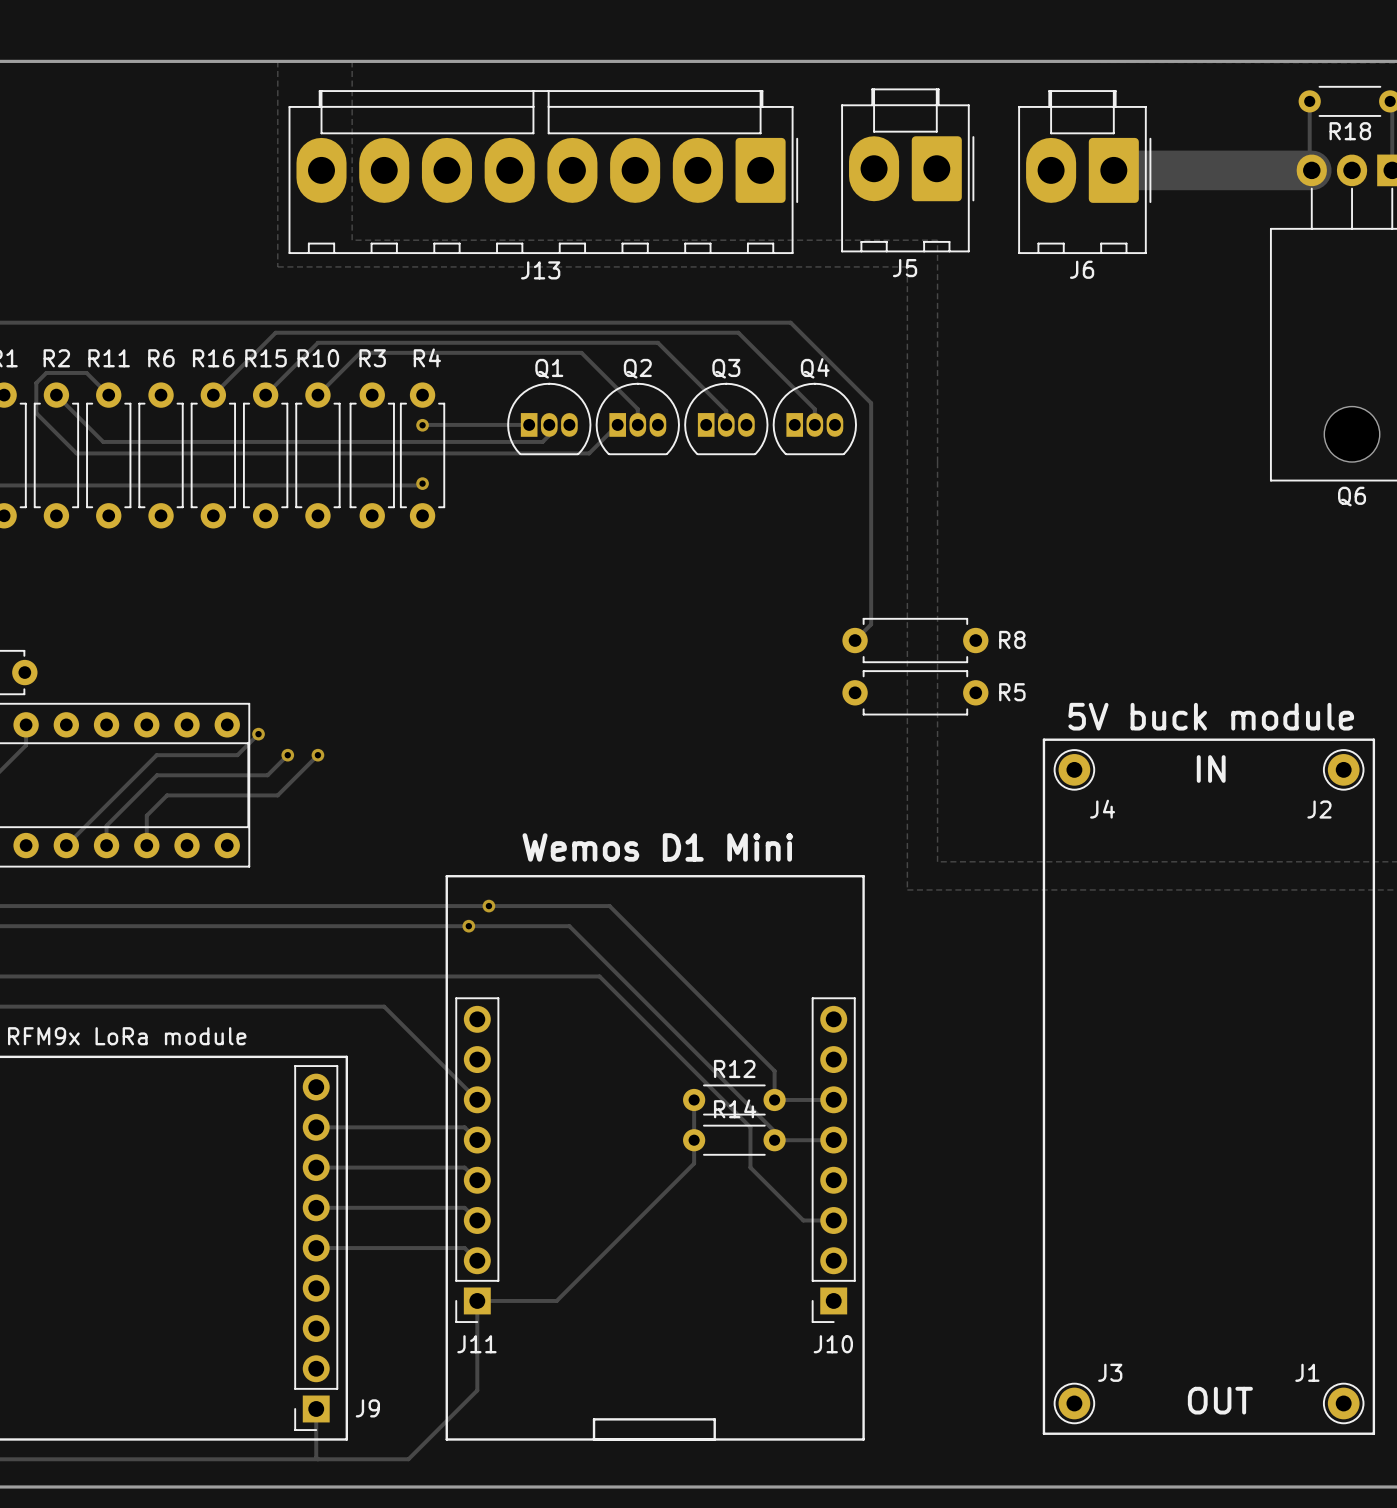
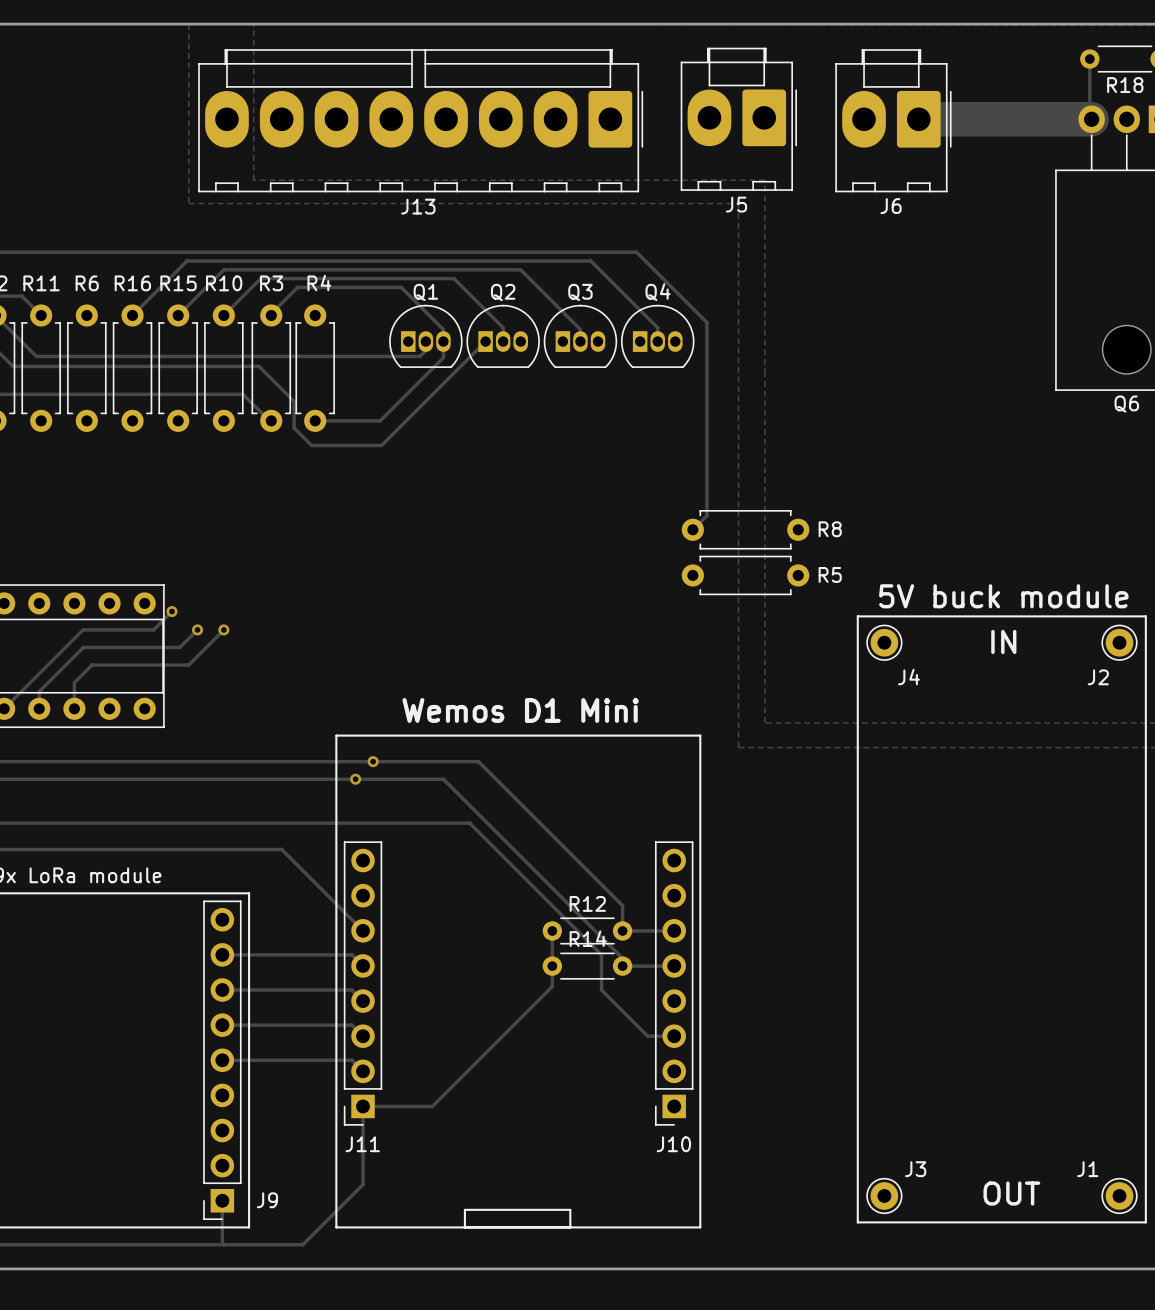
track: none -> (269, 315) (297, 287) (401, 287) (443, 329) (443, 357) (380, 420) (315, 420)
track: (529, 424) (422, 425) -> none
via: (422, 425) -> none
track: (358, 453) (589, 453) -> (258, 366) (294, 401) (294, 427) (311, 445) (381, 445) (460, 366)
track: (422, 483) (420, 485) (339, 485) -> (269, 420) (243, 394)
via: (422, 483) -> none

